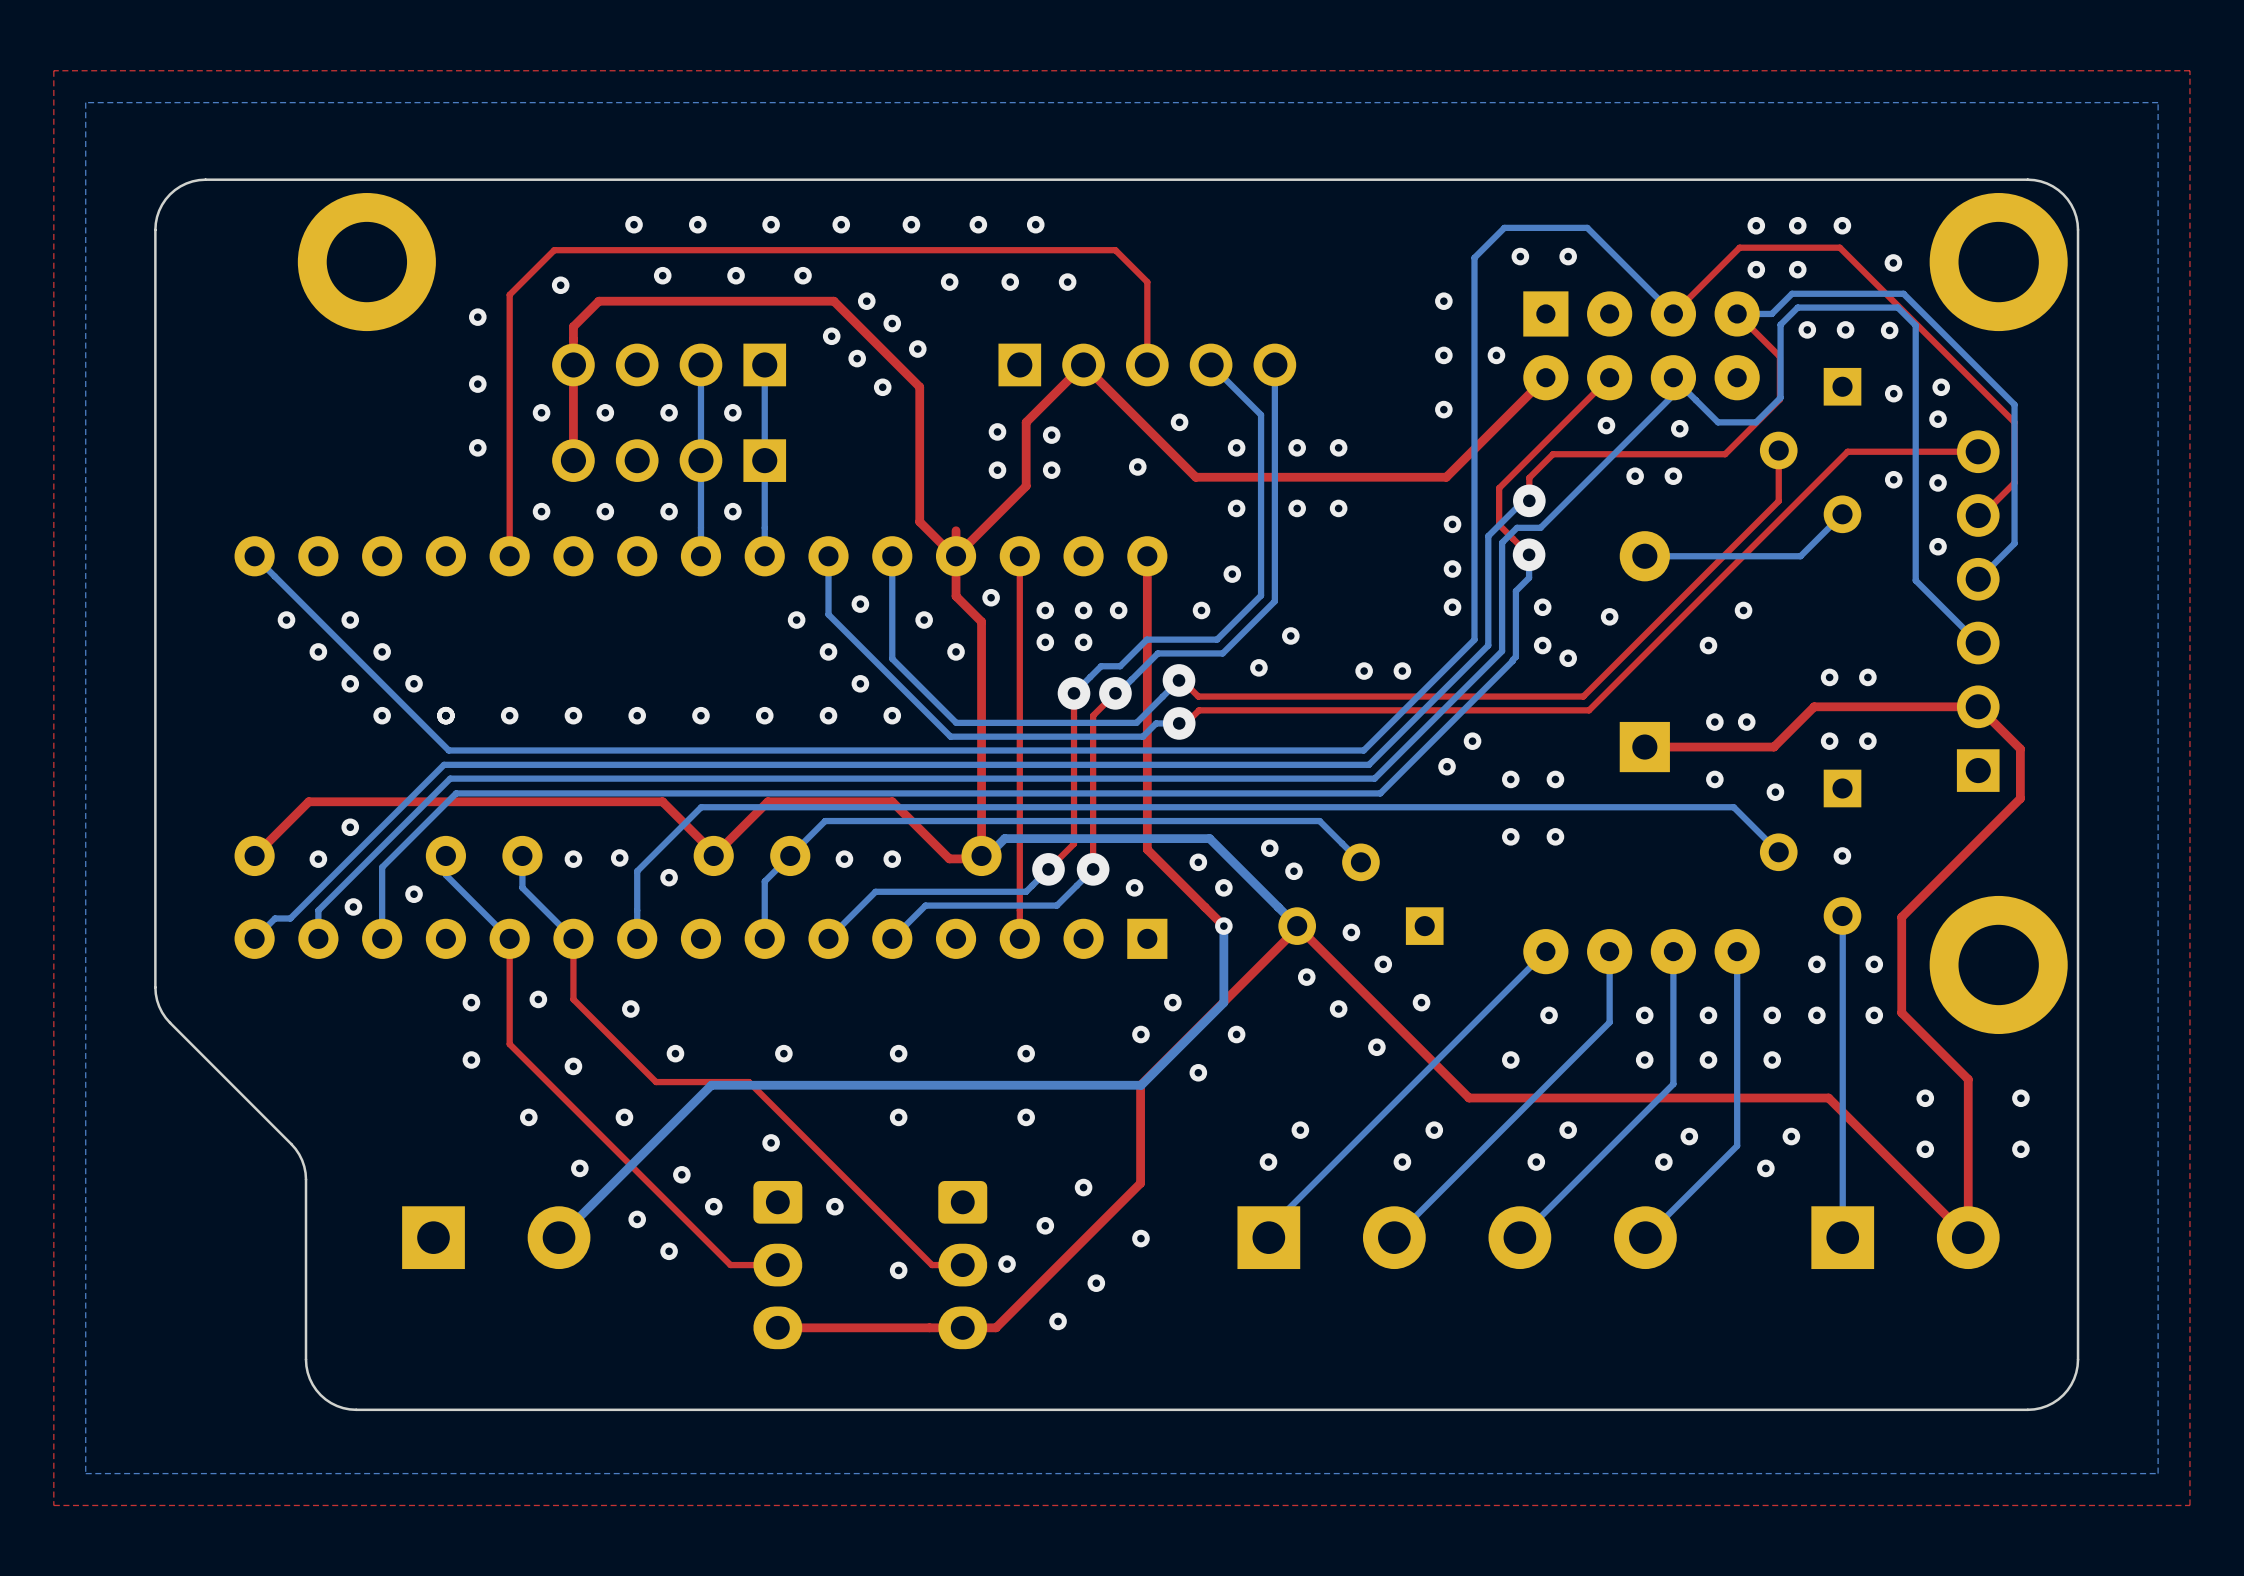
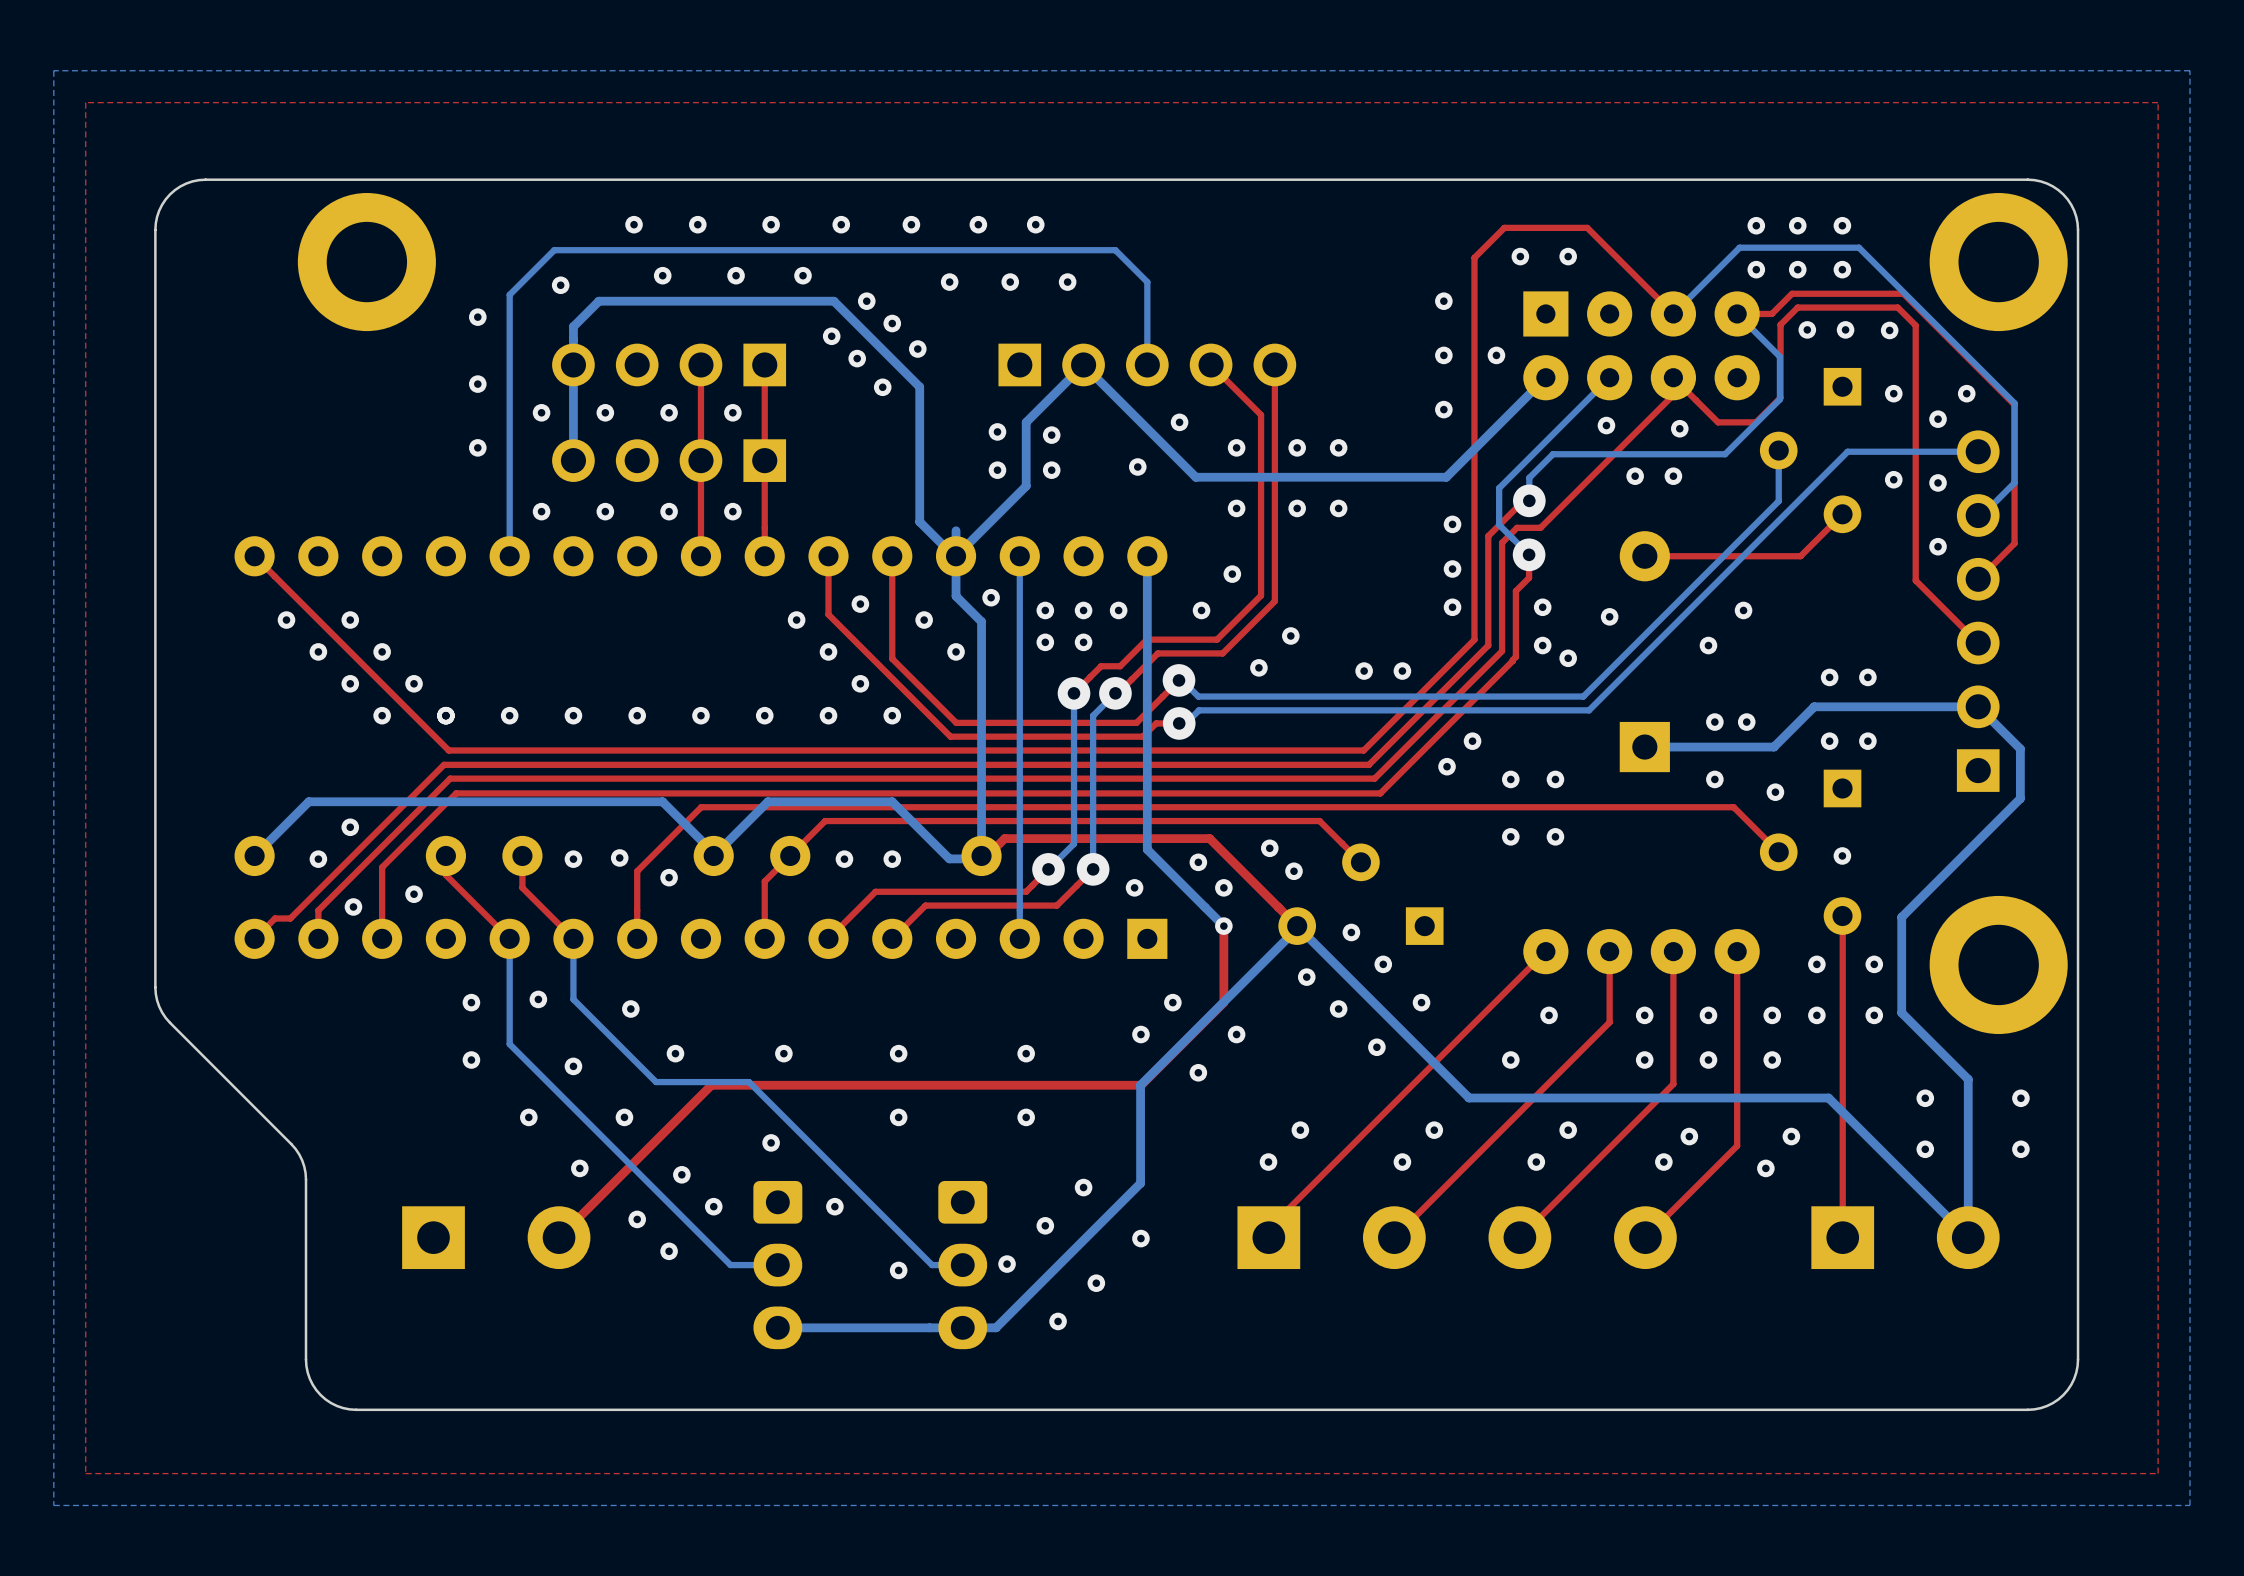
top zone outline: (2189, 70) (53, 70) (53, 1505) (2189, 1505) (2189, 70) -> (2158, 102) (2158, 1473) (85, 1473) (85, 102) (2158, 102)
bottom zone outline: (2158, 102) (85, 102) (85, 1473) (2158, 1473) (2158, 102) -> (2189, 70) (2189, 1505) (53, 1505) (53, 70) (2189, 70)
via position: (1893, 262) -> (1842, 269)
top track: (1673, 313) (1739, 247) (1839, 247) (2014, 422) -> (1737, 313) (1771, 313) (1792, 293) (1903, 293) (2014, 404) (2014, 422)
top track: none -> (1673, 313) (1587, 227) (1504, 227) (1474, 257) (1474, 639) (1363, 750) (448, 750) (254, 556)
bottom track: (1673, 313) (1587, 227) (1504, 227) (1474, 257) (1474, 639) (1363, 750) (448, 750) (254, 556) -> none
top track: (1737, 313) (1779, 356) (1779, 399) (1725, 454) (1552, 454) (1529, 477) (1529, 500) -> (254, 938) (275, 918) (290, 918) (444, 764) (1368, 764) (1488, 645) (1488, 536) (1523, 500) (1529, 500)
bottom track: (1737, 313) (1771, 313) (1792, 293) (1903, 293) (2014, 404) -> (1673, 313) (1739, 247) (1859, 247) (2014, 404)
top track: none -> (700, 364) (700, 556)
bottom track: (700, 364) (700, 556) -> none
top track: none -> (764, 364) (764, 556)
bottom track: (764, 364) (764, 556) -> none
top track: (1147, 364) (1147, 282) (1115, 250) (554, 250) (509, 294) (509, 556) -> none
bottom track: none -> (1147, 364) (1147, 282) (1115, 250) (554, 250) (509, 294) (509, 556)
top track: none -> (1211, 364) (1261, 414) (1261, 595) (1217, 639) (1146, 639) (1120, 666) (1101, 666) (1074, 693)
bottom track: (1211, 364) (1261, 414) (1261, 595) (1217, 639) (1146, 639) (1120, 666) (1101, 666) (1074, 693) -> none
top track: none -> (1274, 364) (1274, 601) (1222, 653) (1157, 653) (1115, 695)
bottom track: (1274, 364) (1274, 601) (1222, 653) (1157, 653) (1115, 695) -> none
top track: (1545, 377) (1446, 477) (1195, 477) (1083, 364) (1026, 422) (1026, 486) (954, 556) (919, 521) (919, 387) (833, 301) (598, 301) (573, 326) (573, 460) -> none
bottom track: none -> (1545, 377) (1446, 477) (1195, 477) (1083, 364) (1026, 422) (1026, 486) (954, 556) (919, 521) (919, 387) (833, 301) (598, 301) (573, 326) (573, 460)
top track: (1609, 377) (1499, 488) (1499, 524) (1529, 554) -> (382, 938) (382, 867) (456, 793) (1380, 793) (1515, 656) (1515, 591) (1529, 577) (1529, 554)
top track: none -> (1673, 377) (1718, 422) (1756, 422) (1780, 397) (1780, 324) (1797, 307) (1897, 307) (1915, 325) (1915, 580) (1978, 643)
top track: none -> (1673, 377) (1673, 395) (1540, 527) (1517, 527) (1502, 542) (1502, 651) (1374, 778) (450, 778) (318, 910) (318, 938)
bottom track: (1673, 377) (1718, 422) (1756, 422) (1780, 397) (1780, 324) (1797, 307) (1897, 307) (1915, 325) (1915, 580) (1978, 643) -> none
bottom track: (1673, 377) (1673, 395) (1540, 527) (1517, 527) (1502, 542) (1502, 651) (1374, 778) (450, 778) (318, 910) (318, 938) -> none
via position: (1941, 387) -> (1966, 393)
top track: (1778, 450) (1778, 501) (1583, 696) (1198, 696) (1182, 680) (1179, 680) -> (892, 556) (892, 658) (956, 722) (1136, 722) (1179, 680)
top track: (1978, 451) (1847, 451) (1589, 710) (1199, 710) (1185, 723) (1179, 723) -> (828, 556) (828, 614) (950, 736) (1142, 736) (1156, 723) (1179, 723)
top track: (2014, 482) (1981, 515) (1978, 515) -> (2014, 482) (2014, 543) (1978, 579)
bottom track: (2014, 482) (2014, 543) (1978, 579) -> (2014, 482) (1981, 515) (1978, 515)
bottom track: (1529, 500) (1523, 500) (1488, 536) (1488, 645) (1368, 764) (444, 764) (290, 918) (275, 918) (254, 938) -> (1529, 500) (1529, 477) (1552, 454) (1725, 454) (1779, 399) (1779, 356) (1737, 313)
top track: none -> (1842, 514) (1800, 556) (1644, 556)
bottom track: (1842, 514) (1800, 556) (1644, 556) -> none
top track: (956, 530) (956, 596) (981, 621) (981, 855) (978, 858) (949, 858) (892, 801) (767, 801) (715, 854) (662, 801) (308, 801) (254, 855) -> none
bottom track: none -> (956, 530) (956, 596) (981, 621) (981, 855) (978, 858) (949, 858) (892, 801) (767, 801) (715, 854) (662, 801) (308, 801) (254, 855)
bottom track: (1529, 554) (1529, 577) (1515, 591) (1515, 656) (1380, 793) (456, 793) (382, 867) (382, 938) -> (1529, 554) (1499, 524) (1499, 488) (1609, 377)
bottom track: (828, 556) (828, 614) (950, 736) (1142, 736) (1156, 723) (1179, 723) -> (1978, 451) (1847, 451) (1589, 710) (1199, 710) (1185, 723) (1179, 723)
bottom track: (892, 556) (892, 658) (956, 722) (1136, 722) (1179, 680) -> (1778, 450) (1778, 501) (1583, 696) (1198, 696) (1182, 680) (1179, 680)
top track: (1019, 556) (1019, 938) -> none
bottom track: none -> (1019, 556) (1019, 938)
top track: (1147, 556) (1147, 849) (1223, 926) -> (559, 1237) (711, 1085) (1141, 1085) (1223, 1002) (1223, 926)
top track: (1074, 693) (1074, 843) (1048, 869) -> (828, 938) (875, 891) (1026, 891) (1048, 869)
top track: (1115, 695) (1112, 695) (1093, 715) (1093, 869) -> (892, 938) (925, 905) (1056, 905) (1093, 869)
top track: (1644, 747) (1773, 747) (1814, 706) (1978, 706) (2020, 748) (2020, 798) (1901, 917) (1901, 1012) (1968, 1079) (1968, 1237) (1828, 1098) (1469, 1098) (1297, 926) (1297, 928) (1140, 1085) (1140, 1183) (996, 1327) (777, 1327) -> none
bottom track: none -> (1644, 747) (1773, 747) (1814, 706) (1978, 706) (2020, 748) (2020, 798) (1901, 917) (1901, 1012) (1968, 1079) (1968, 1237) (1828, 1098) (1469, 1098) (1297, 926) (1297, 928) (1140, 1085) (1140, 1183) (996, 1327) (777, 1327)
top track: none -> (1778, 852) (1733, 807) (701, 807) (637, 871) (637, 938)
bottom track: (1778, 852) (1733, 807) (701, 807) (637, 871) (637, 938) -> none
top track: none -> (445, 855) (445, 875) (509, 938) (509, 928)
bottom track: (445, 855) (445, 875) (509, 938) (509, 928) -> none
bottom track: (522, 855) (522, 887) (573, 938) -> (962, 1265) (932, 1265) (749, 1082) (656, 1082) (573, 999) (573, 938)
top track: none -> (984, 858) (1004, 838) (1209, 838) (1297, 926)
bottom track: (984, 858) (1004, 838) (1209, 838) (1297, 926) -> none
top track: none -> (1360, 862) (1319, 821) (825, 821) (764, 881) (764, 938)
bottom track: (1360, 862) (1319, 821) (825, 821) (764, 881) (764, 938) -> none
bottom track: (1048, 869) (1026, 891) (875, 891) (828, 938) -> (1048, 869) (1074, 843) (1074, 693)
bottom track: (1093, 869) (1056, 905) (925, 905) (892, 938) -> (1093, 869) (1093, 715) (1112, 695) (1115, 695)
top track: none -> (1842, 916) (1842, 1237)
bottom track: (1842, 916) (1842, 1237) -> none
bottom track: (1223, 926) (1223, 1002) (1141, 1085) (711, 1085) (559, 1237) -> (1223, 926) (1147, 849) (1147, 556)
top track: (509, 938) (509, 1044) (730, 1265) (777, 1265) -> none
bottom track: none -> (509, 938) (509, 1044) (730, 1265) (777, 1265)
top track: (573, 938) (573, 999) (656, 1082) (749, 1082) (932, 1265) (962, 1265) -> (573, 938) (522, 887) (522, 855)
top track: none -> (1545, 951) (1268, 1228) (1268, 1237)
bottom track: (1545, 951) (1268, 1228) (1268, 1237) -> none
top track: none -> (1609, 951) (1609, 1022) (1394, 1237)
bottom track: (1609, 951) (1609, 1022) (1394, 1237) -> none
top track: none -> (1673, 951) (1673, 1084) (1519, 1237)
bottom track: (1673, 951) (1673, 1084) (1519, 1237) -> none
top track: none -> (1737, 951) (1737, 1145) (1645, 1237)
bottom track: (1737, 951) (1737, 1145) (1645, 1237) -> none

